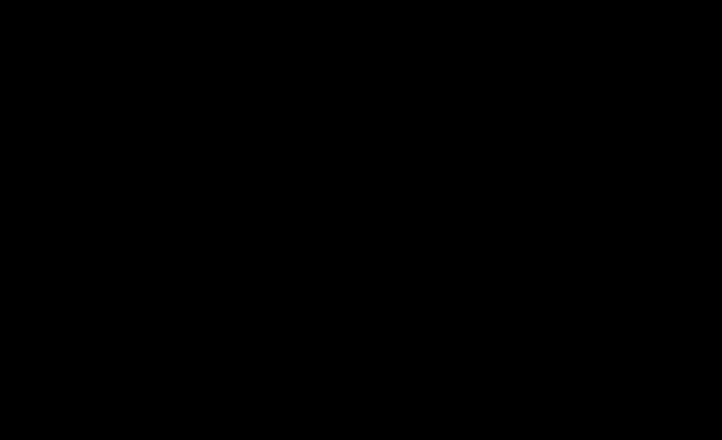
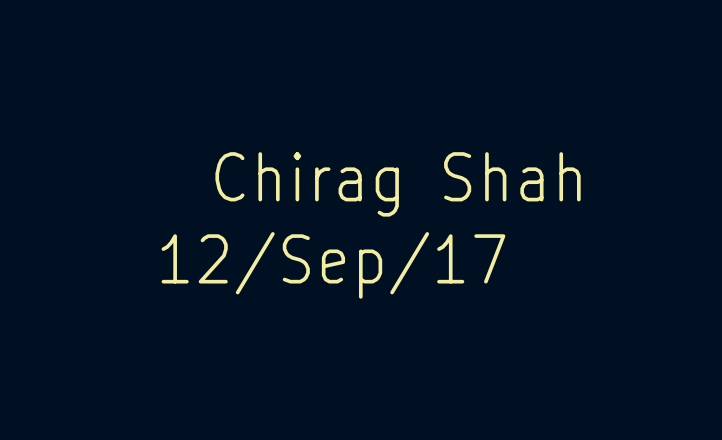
text: none -> Chirag Shah (398, 184)
text: none -> 12/Sep/17 (333, 265)

